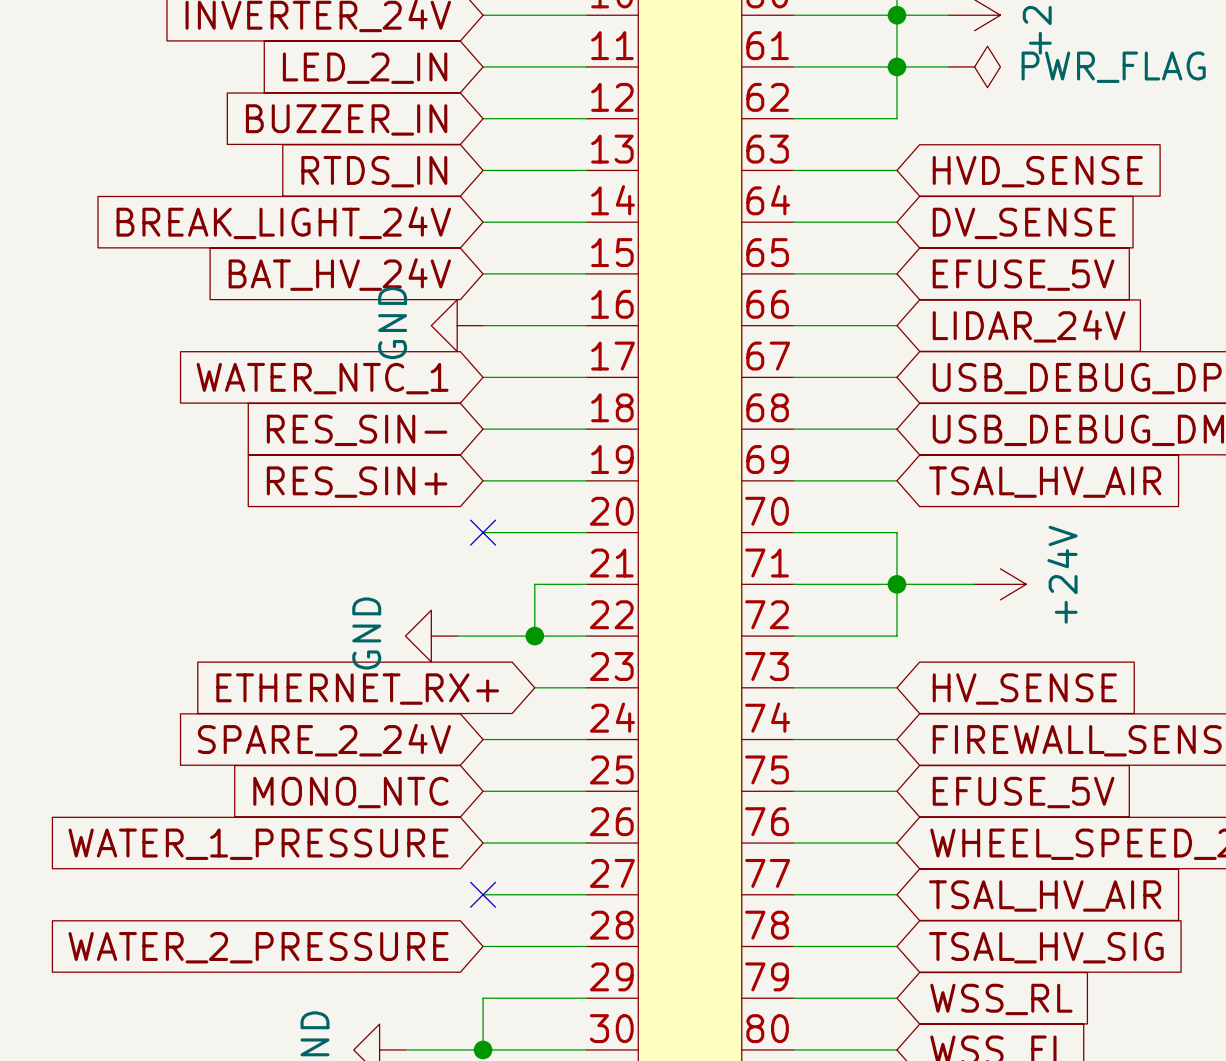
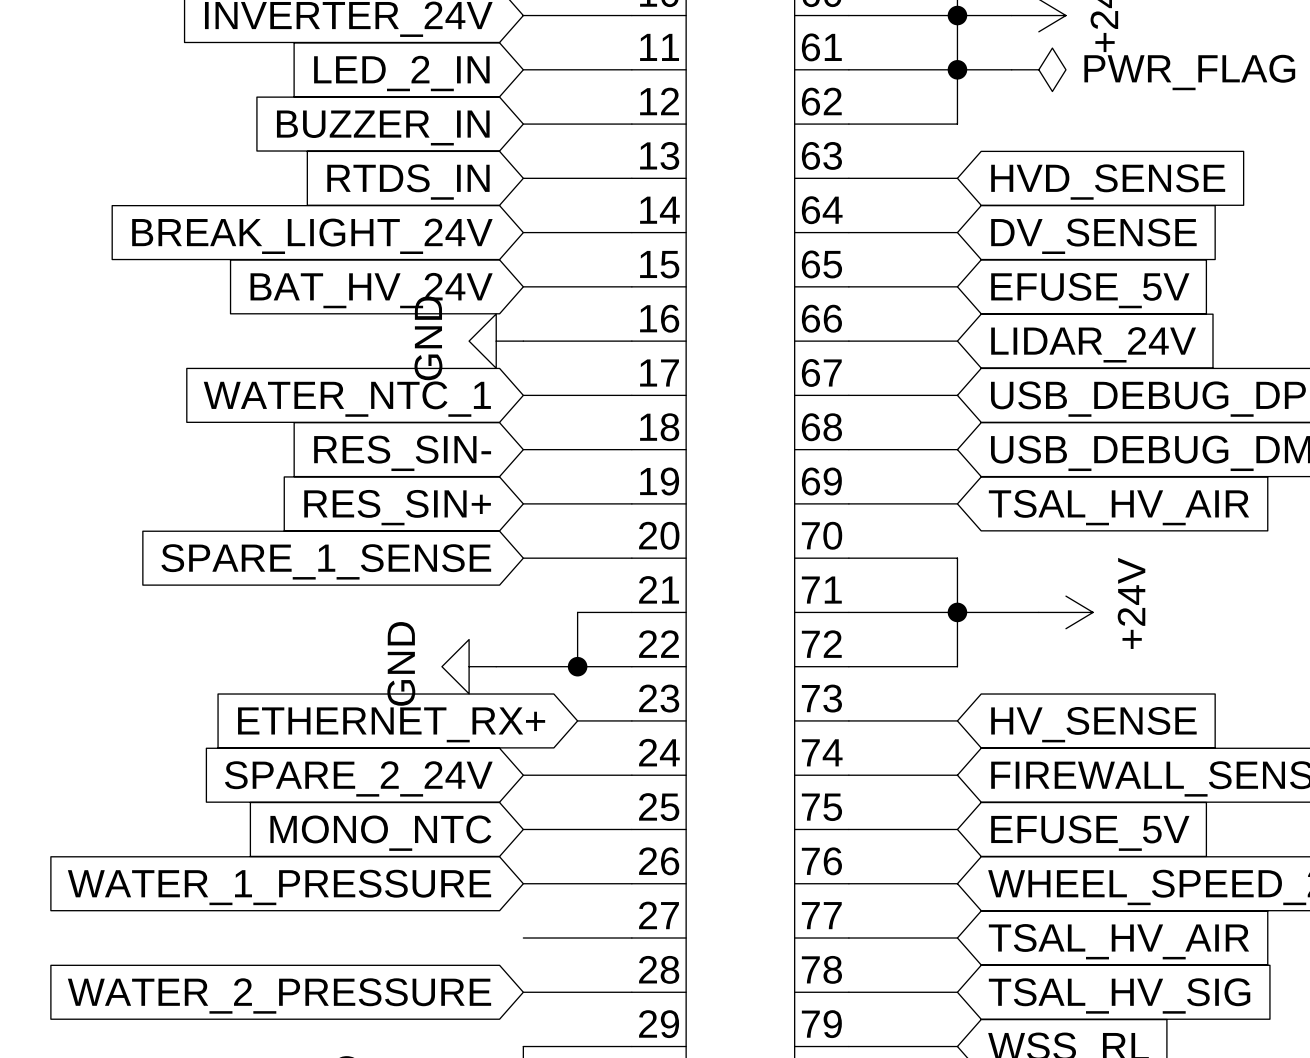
no-connect mark: (483, 532) -> none
global label: none -> SPARE_1_SENSE (326, 561)
no-connect mark: (483, 894) -> none

